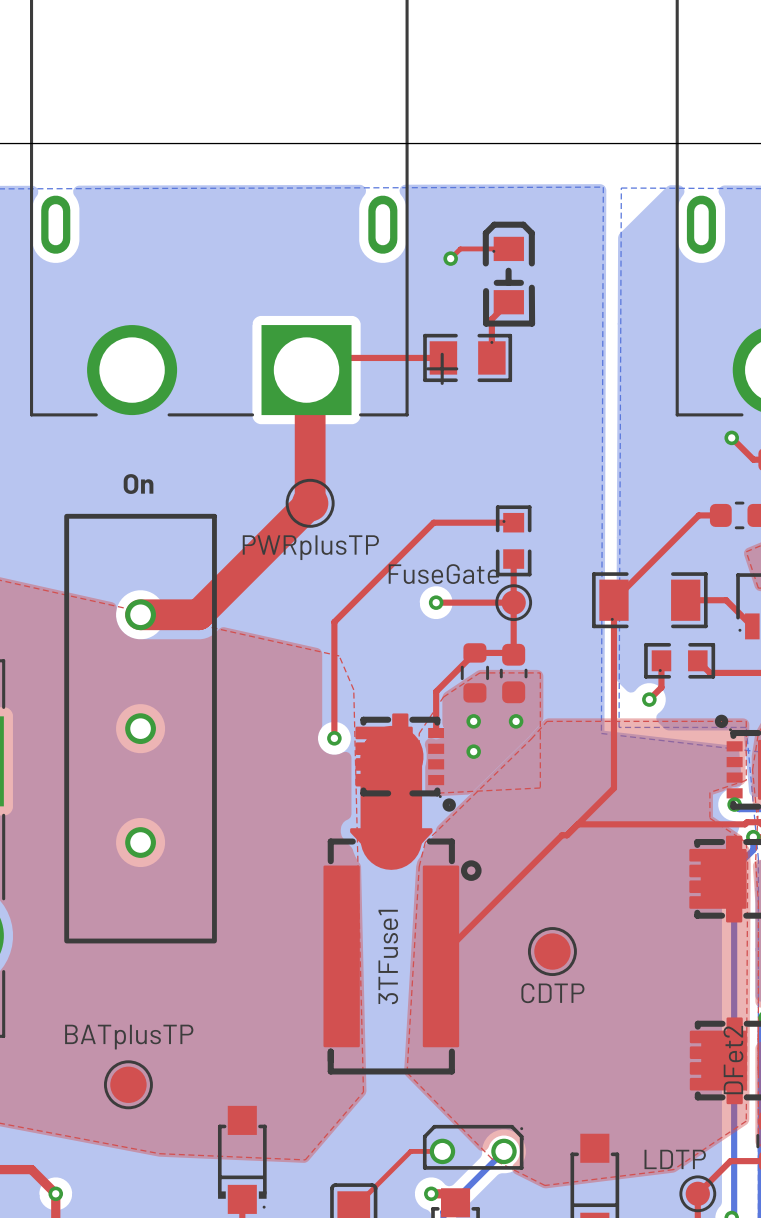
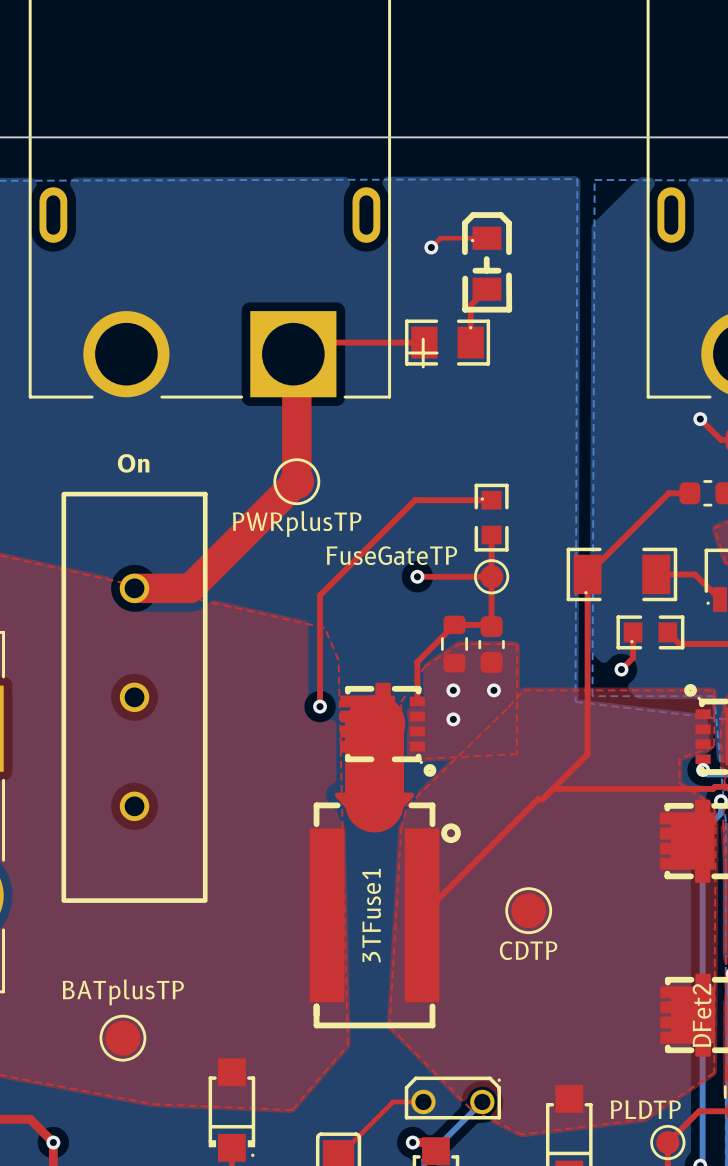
part value: FuseGate (443, 574) -> FuseGateTP (391, 555)
part value: LDTP (675, 1159) -> PLDTP (645, 1109)

